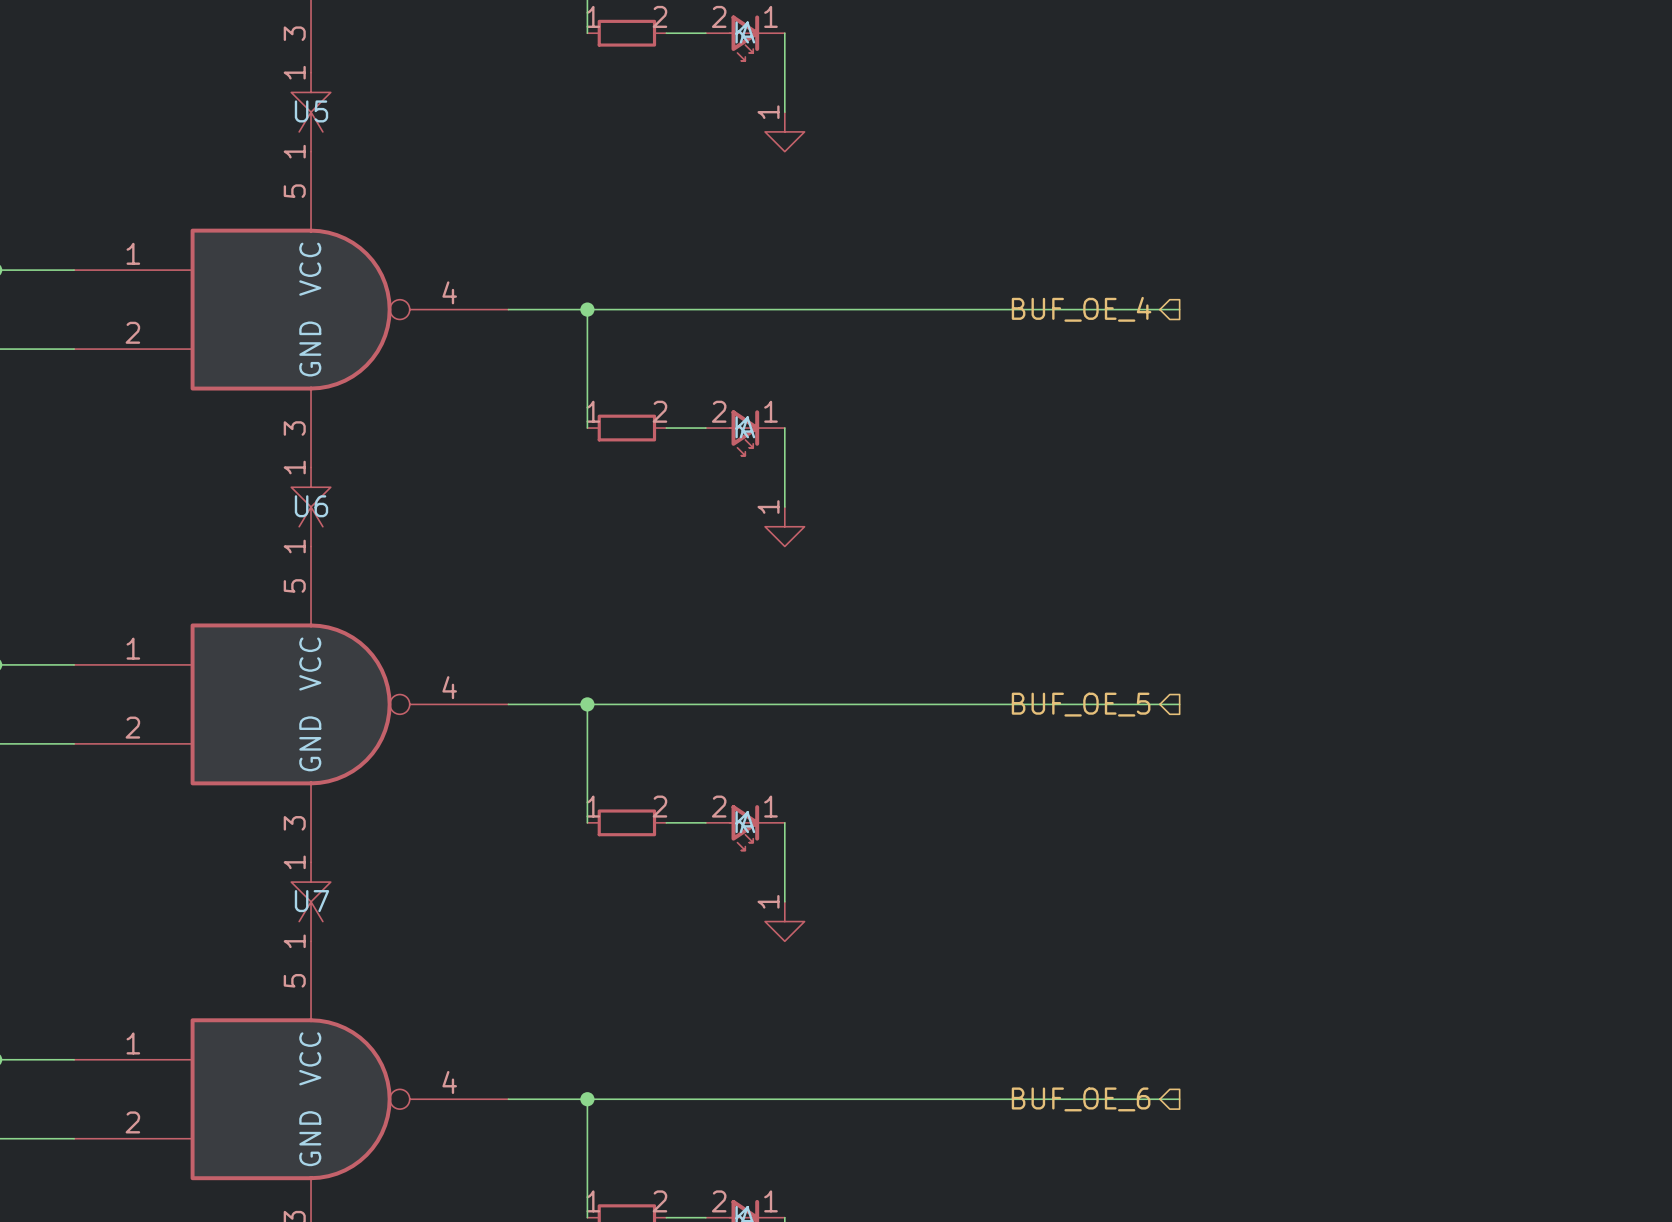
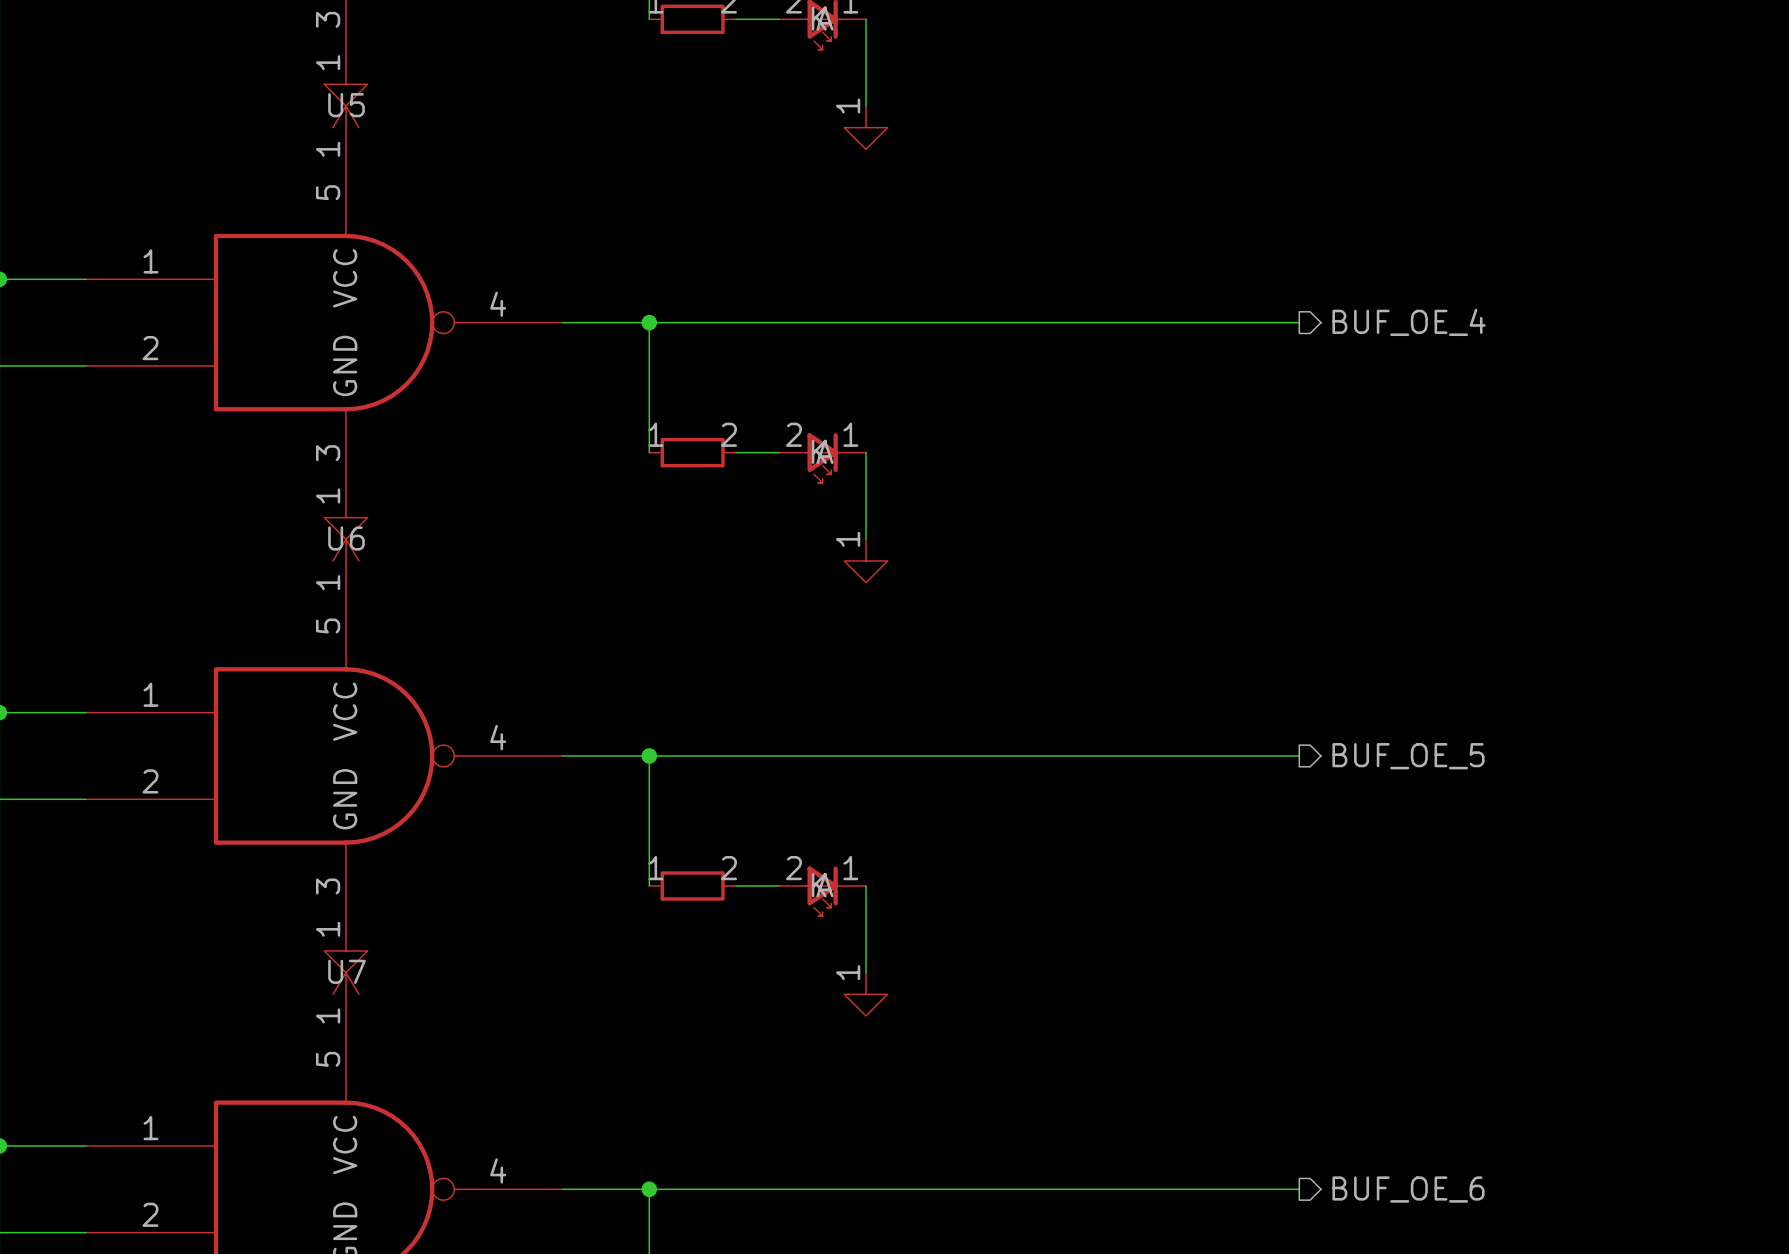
hierarchical label rotation: 0° (1081, 309) -> 180° (1409, 322)
hierarchical label position: BUF_OE_4 (1081, 309) -> BUF_OE_4 (1409, 322)
hierarchical label rotation: 0° (1081, 704) -> 180° (1408, 756)
hierarchical label position: BUF_OE_5 (1081, 704) -> BUF_OE_5 (1408, 756)
hierarchical label rotation: 0° (1081, 1099) -> 180° (1408, 1189)
hierarchical label position: BUF_OE_6 (1081, 1099) -> BUF_OE_6 (1408, 1189)

